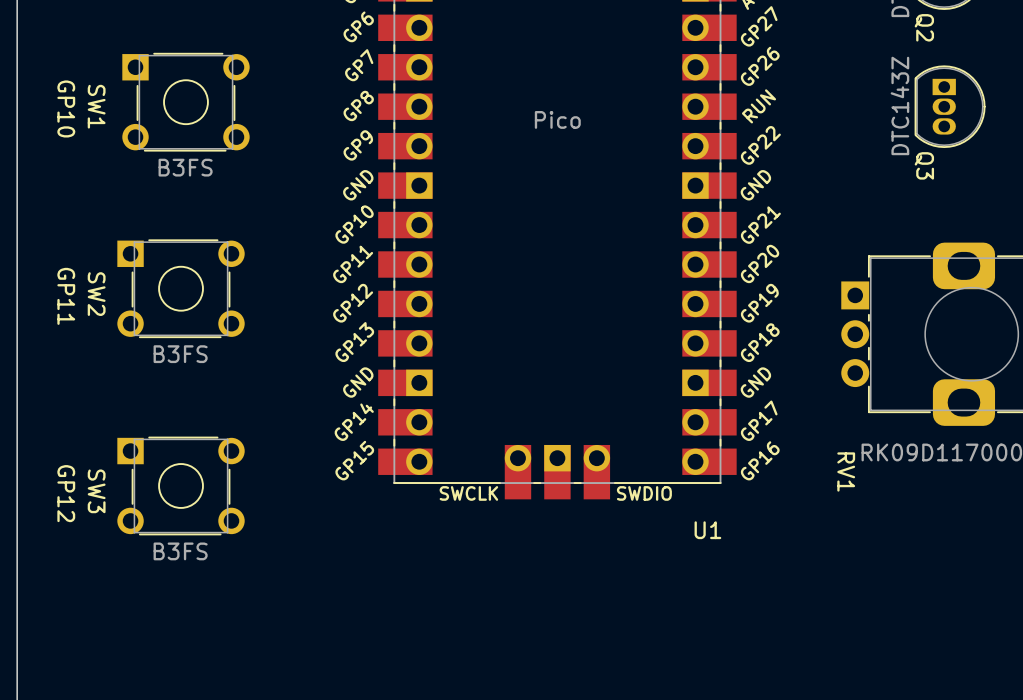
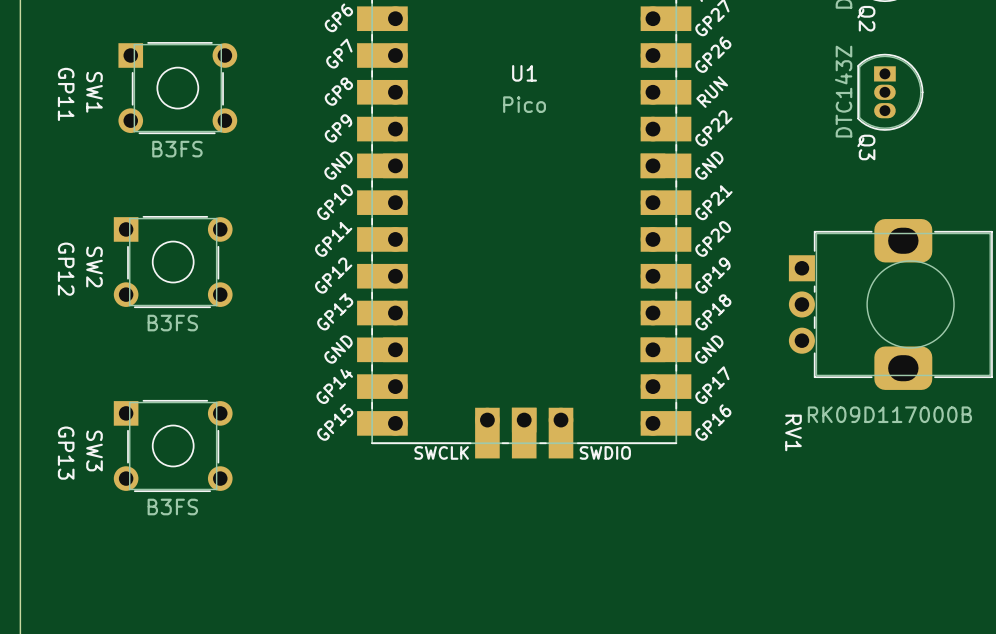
text: GP10 (66, 108) -> GP11 (66, 94)
text: GP11 (66, 296) -> GP12 (66, 269)
text: GP12 (66, 493) -> GP13 (66, 453)
U1 name position: U1 (707, 530) -> U1 (524, 73)

